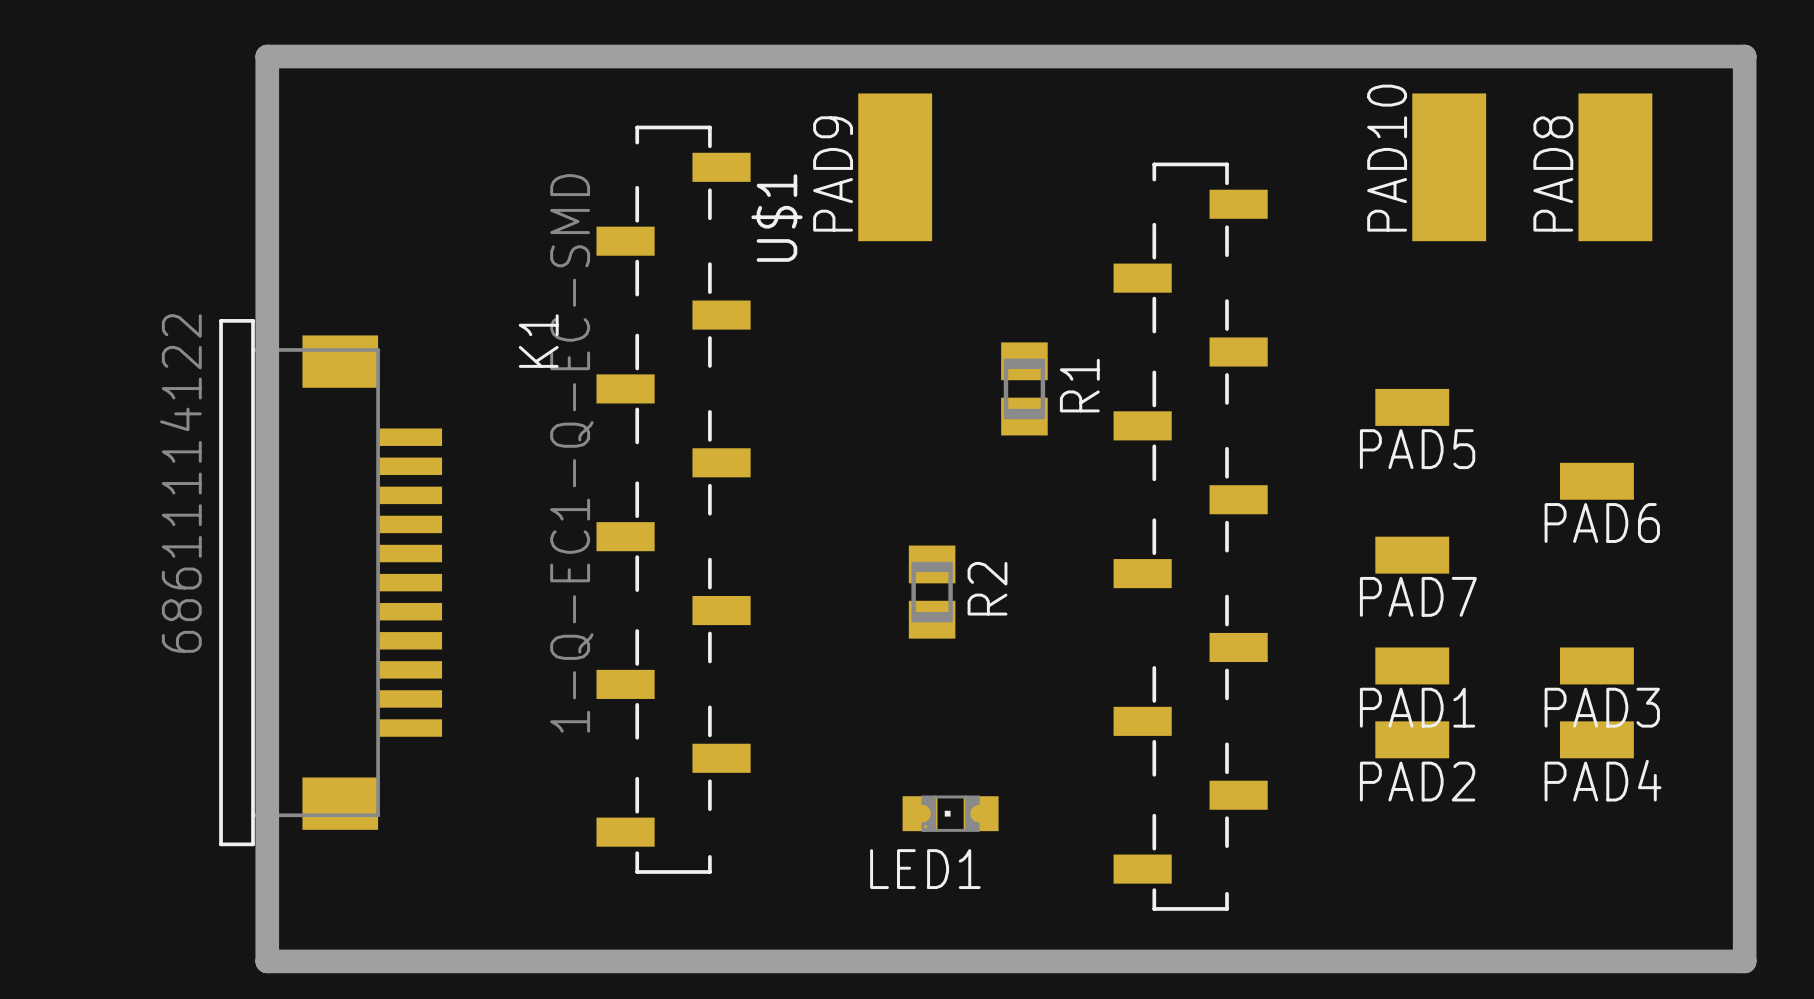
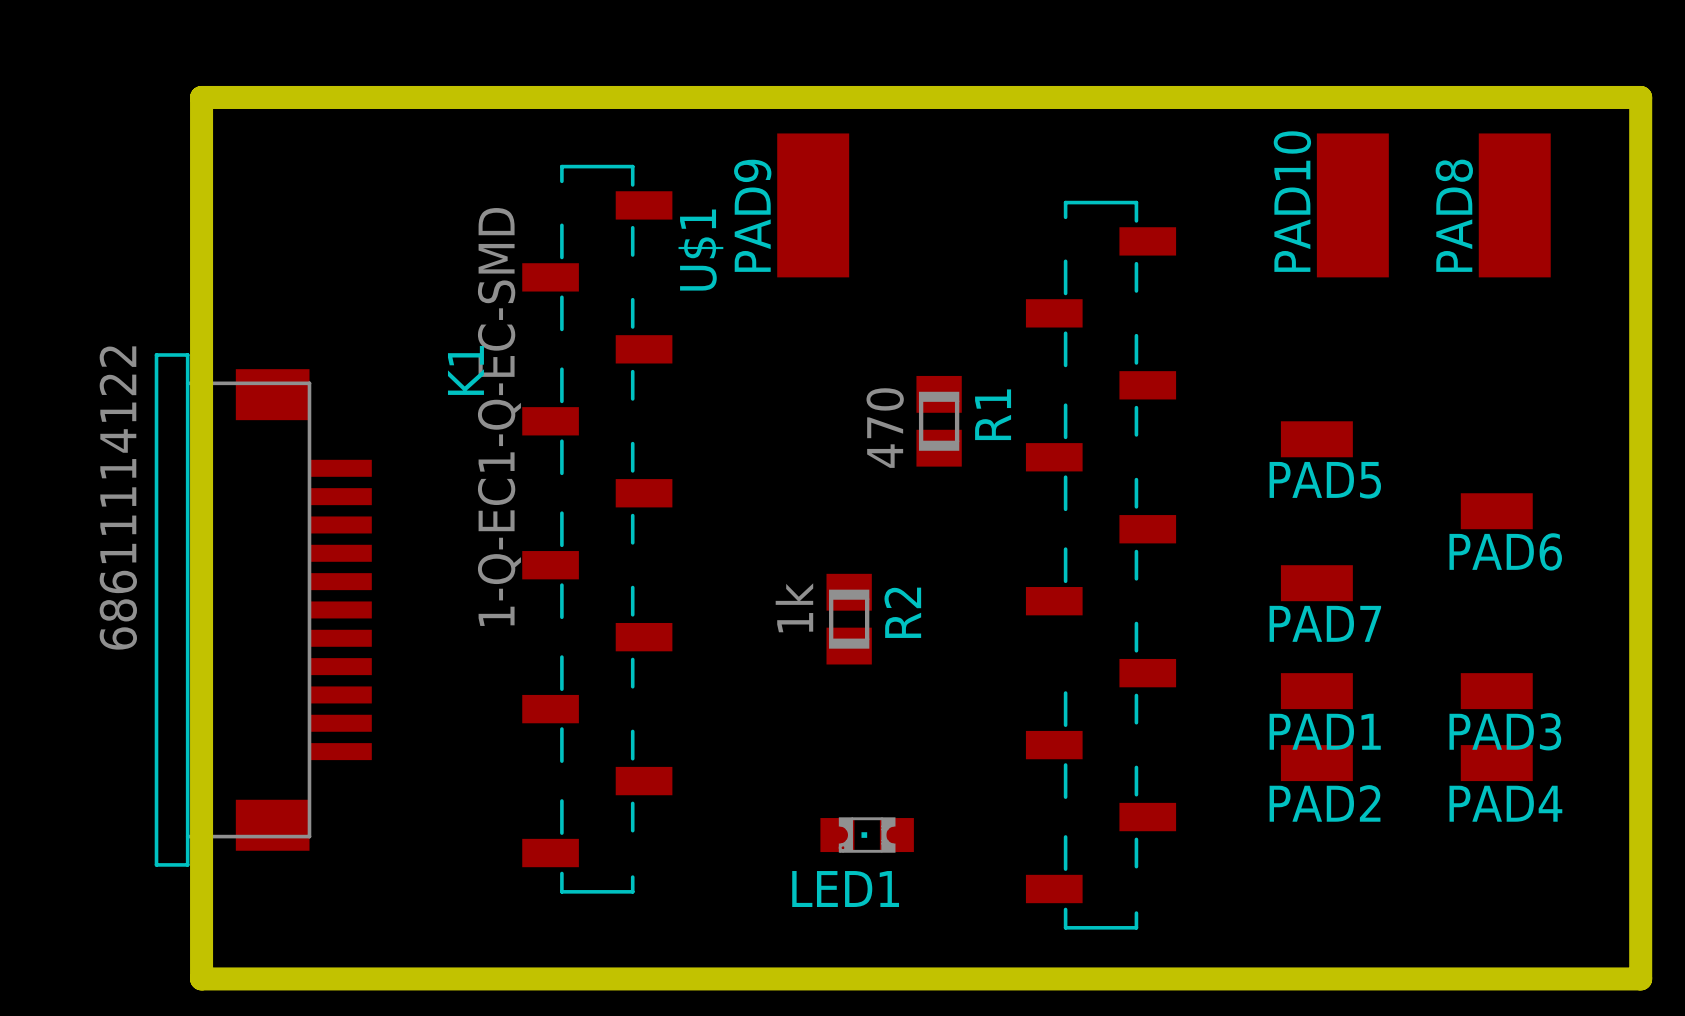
R1 value: none -> 470 (885, 428)
R2 value: none -> 1k (794, 607)

